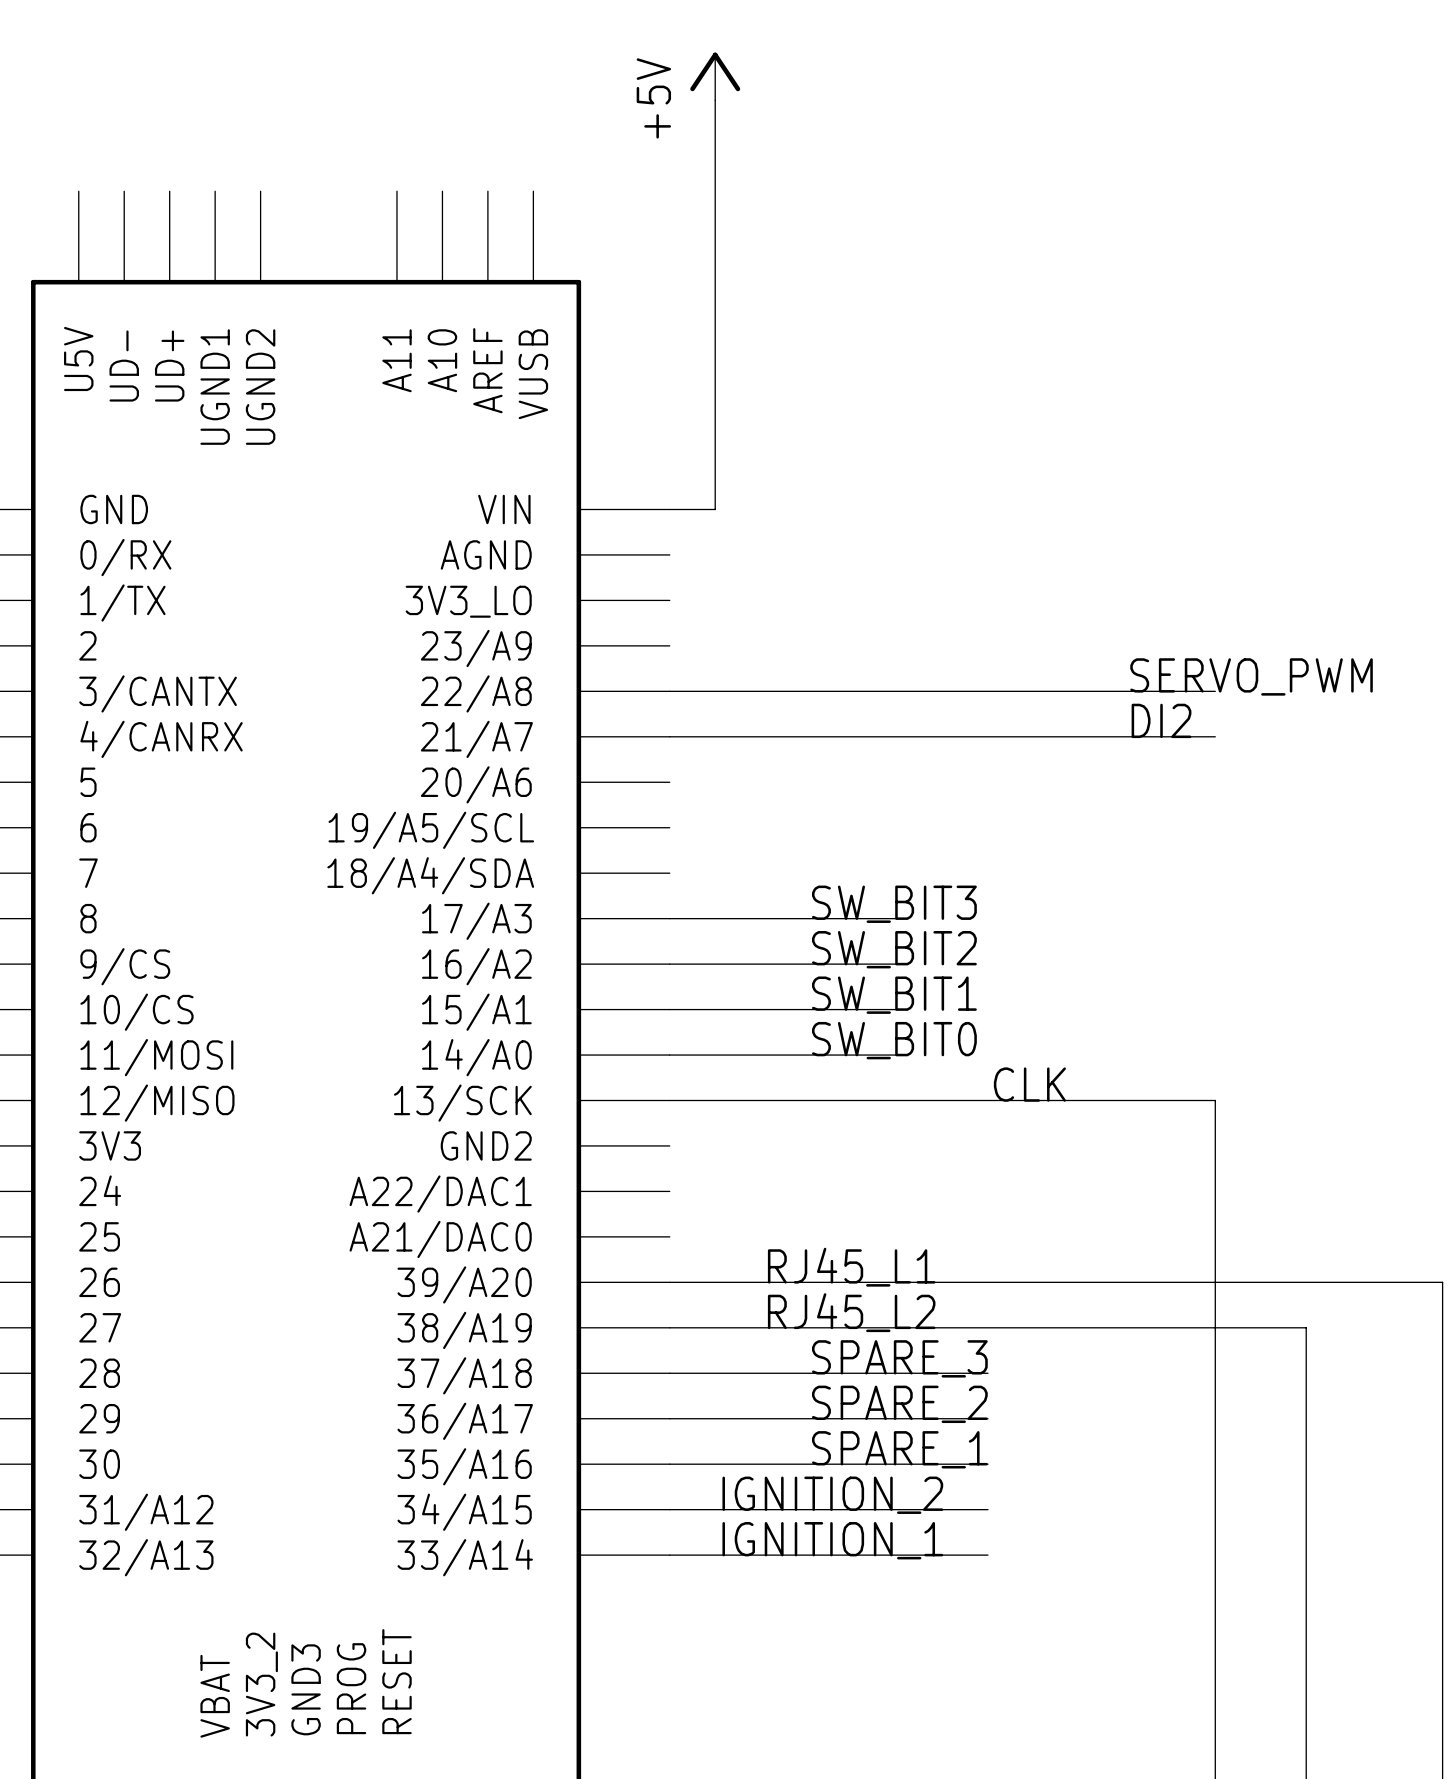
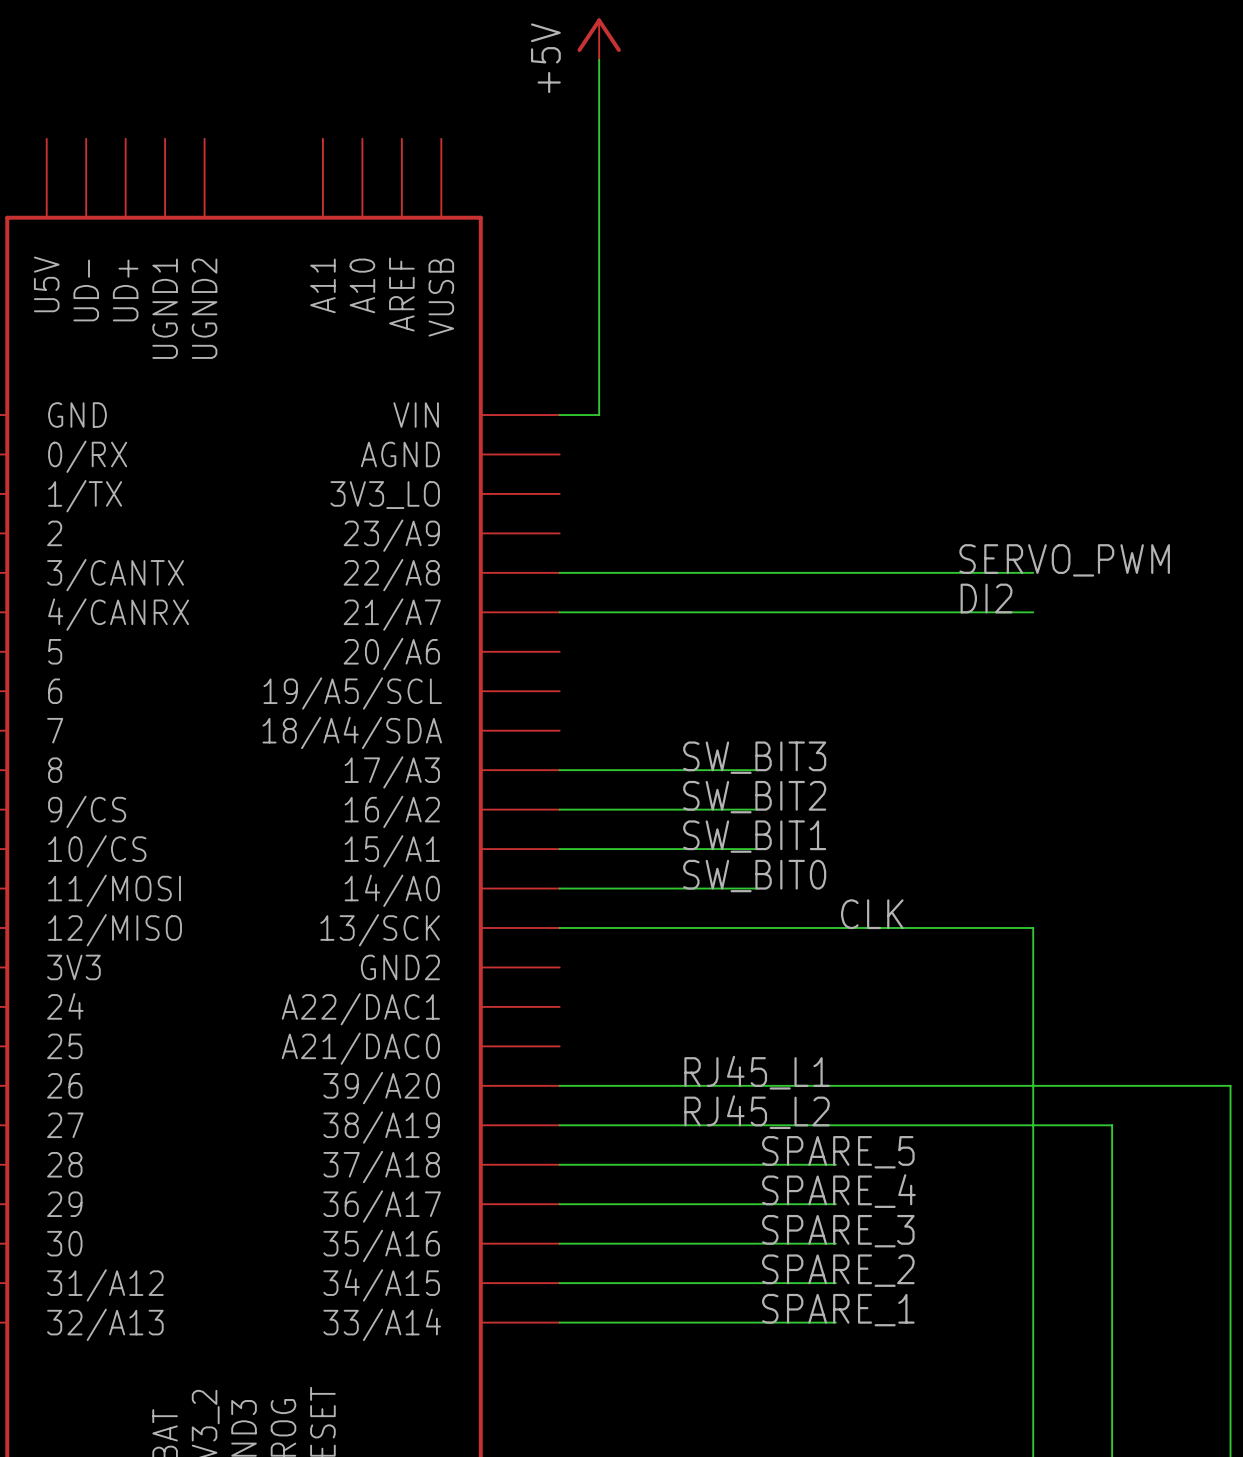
label position: RJ45_L1 (851, 1267) -> RJ45_L1 (757, 1072)
label position: RJ45_L2 (851, 1312) -> RJ45_L2 (757, 1112)
label position: SPARE_3 (899, 1358) -> SPARE_3 (838, 1231)
label: none -> SPARE_5 (838, 1152)
label: none -> SPARE_4 (838, 1191)
label position: SPARE_2 (899, 1404) -> SPARE_2 (838, 1270)
label position: SPARE_1 (899, 1449) -> SPARE_1 (838, 1310)
label: IGNITION_2 (832, 1495) -> none
label: IGNITION_1 (832, 1540) -> none

